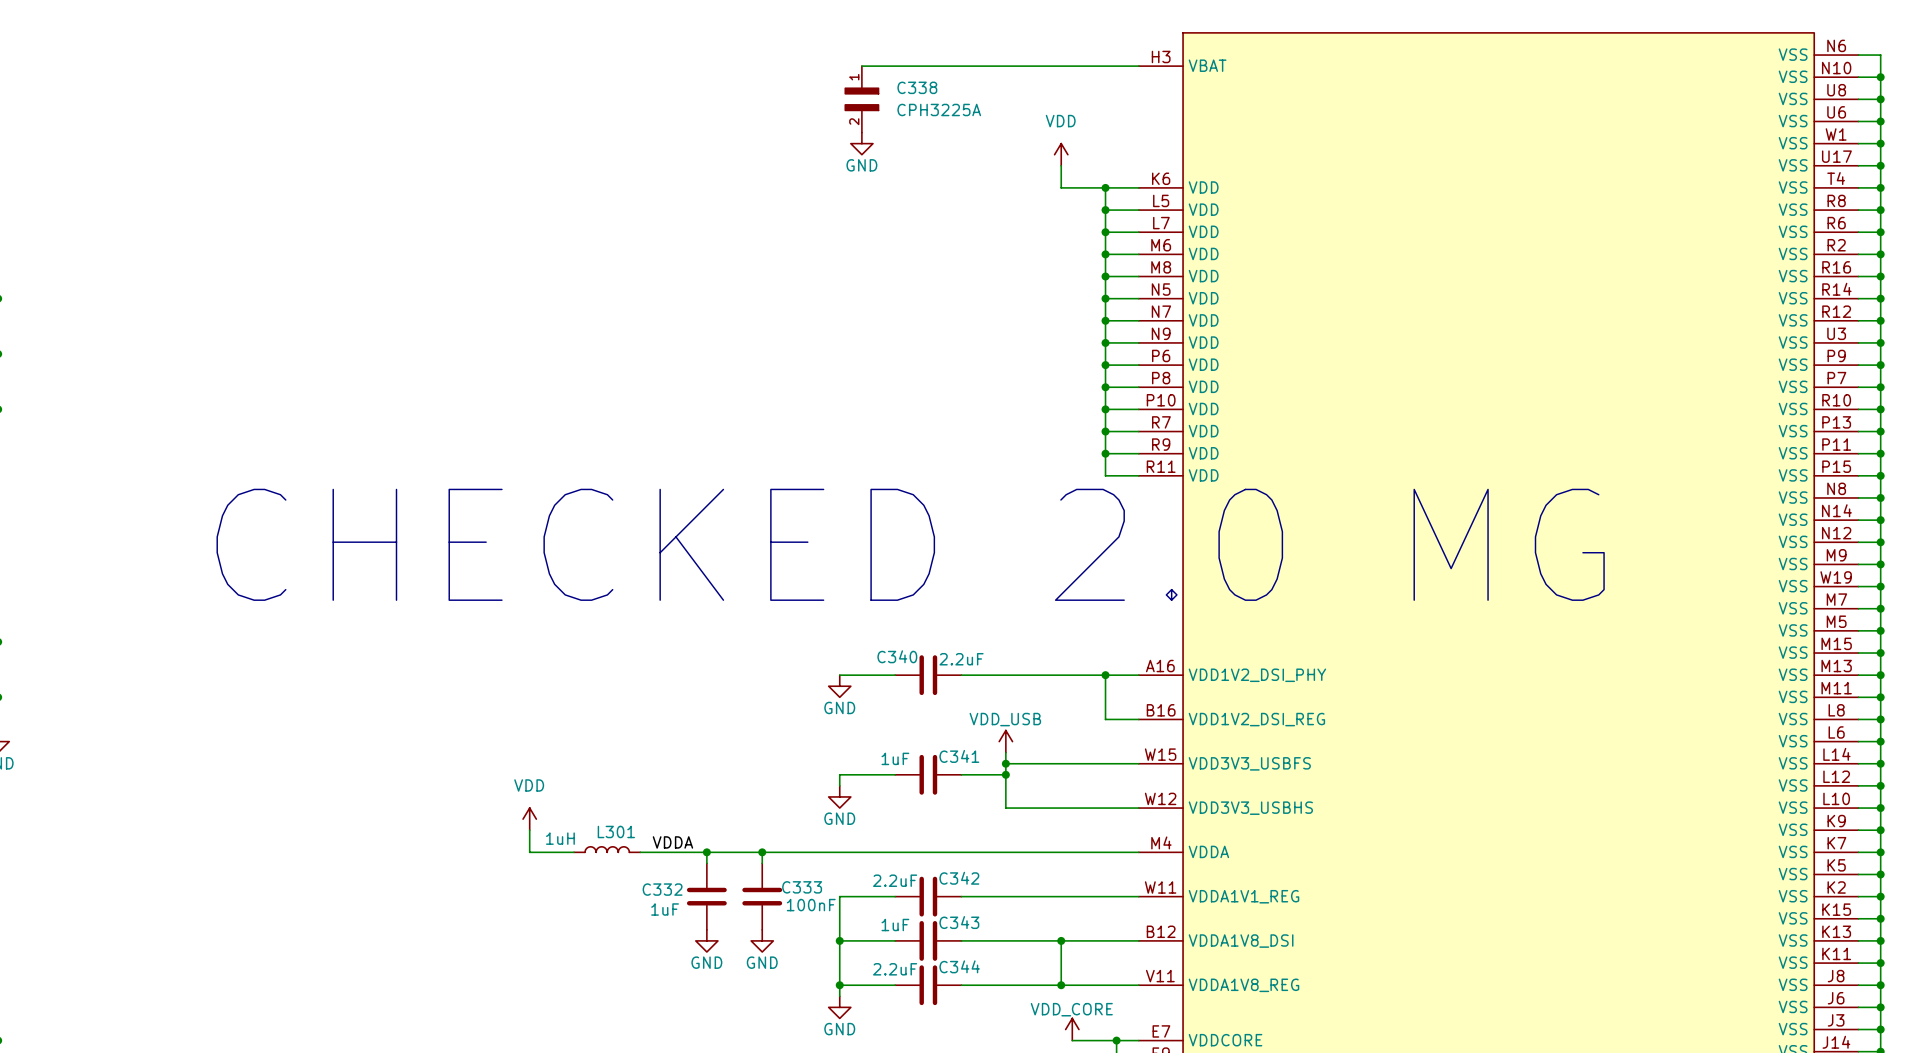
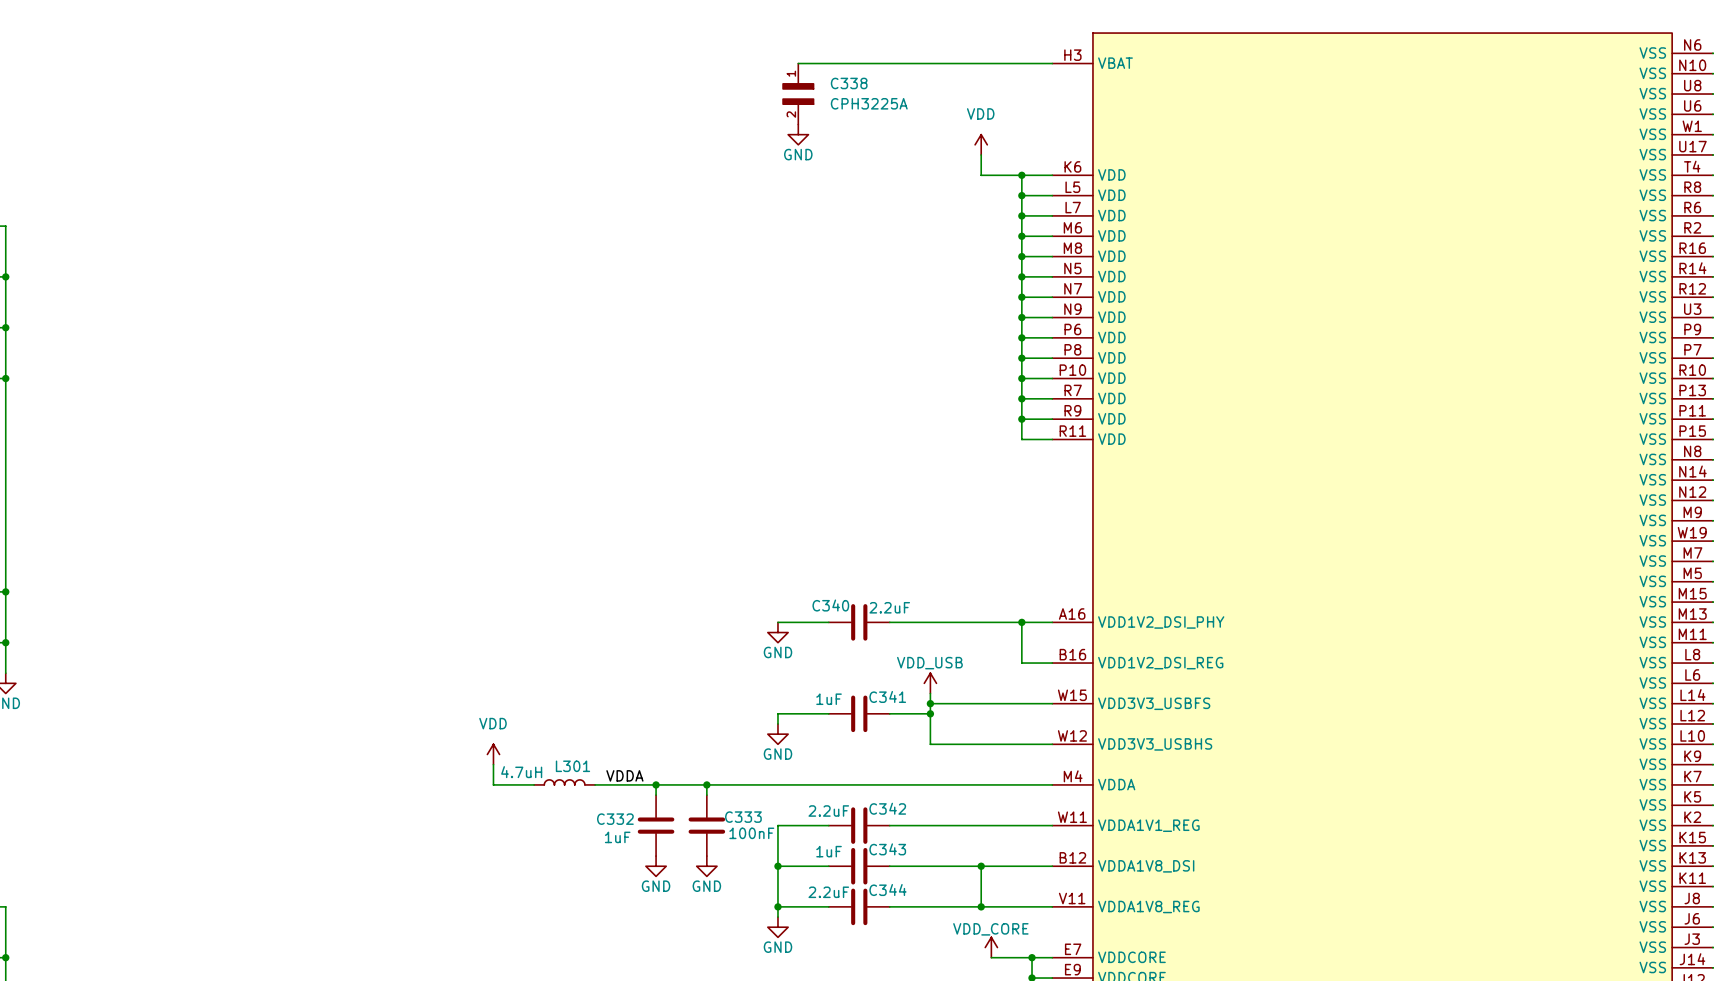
text: CHECKED 2.0 MG (910, 544) -> none
L301 value: 1uH (560, 838) -> 4.7uH (521, 772)

